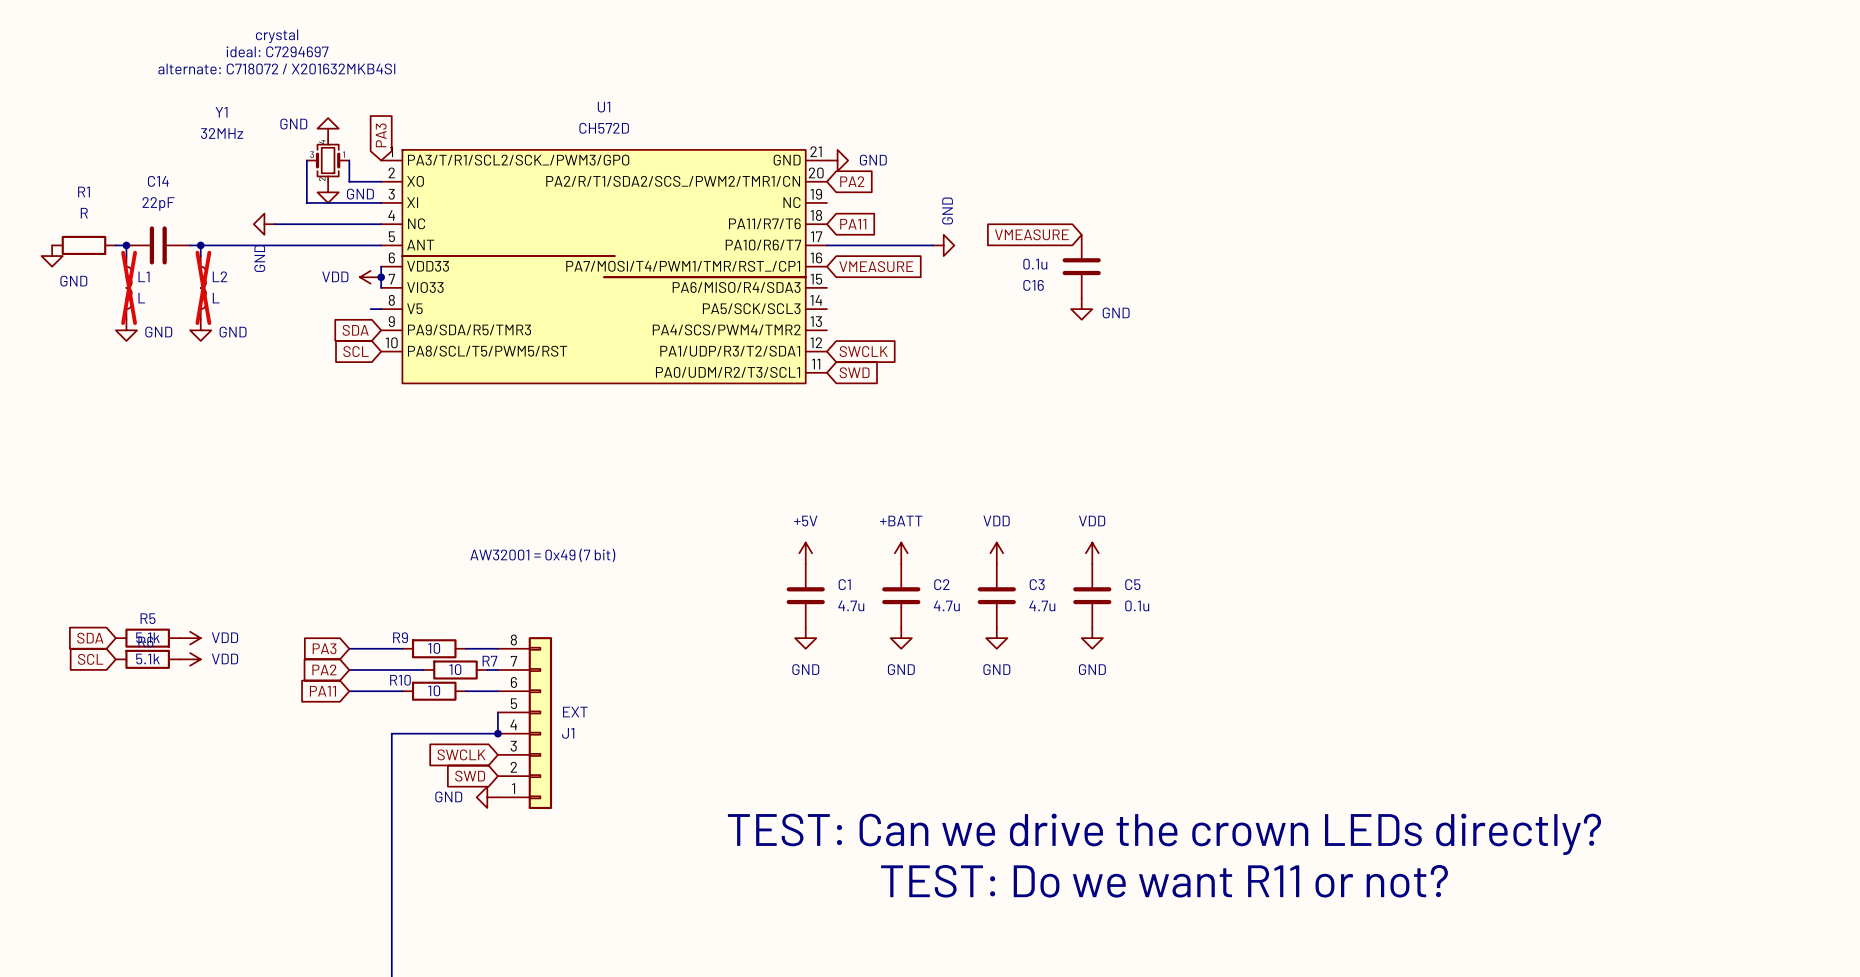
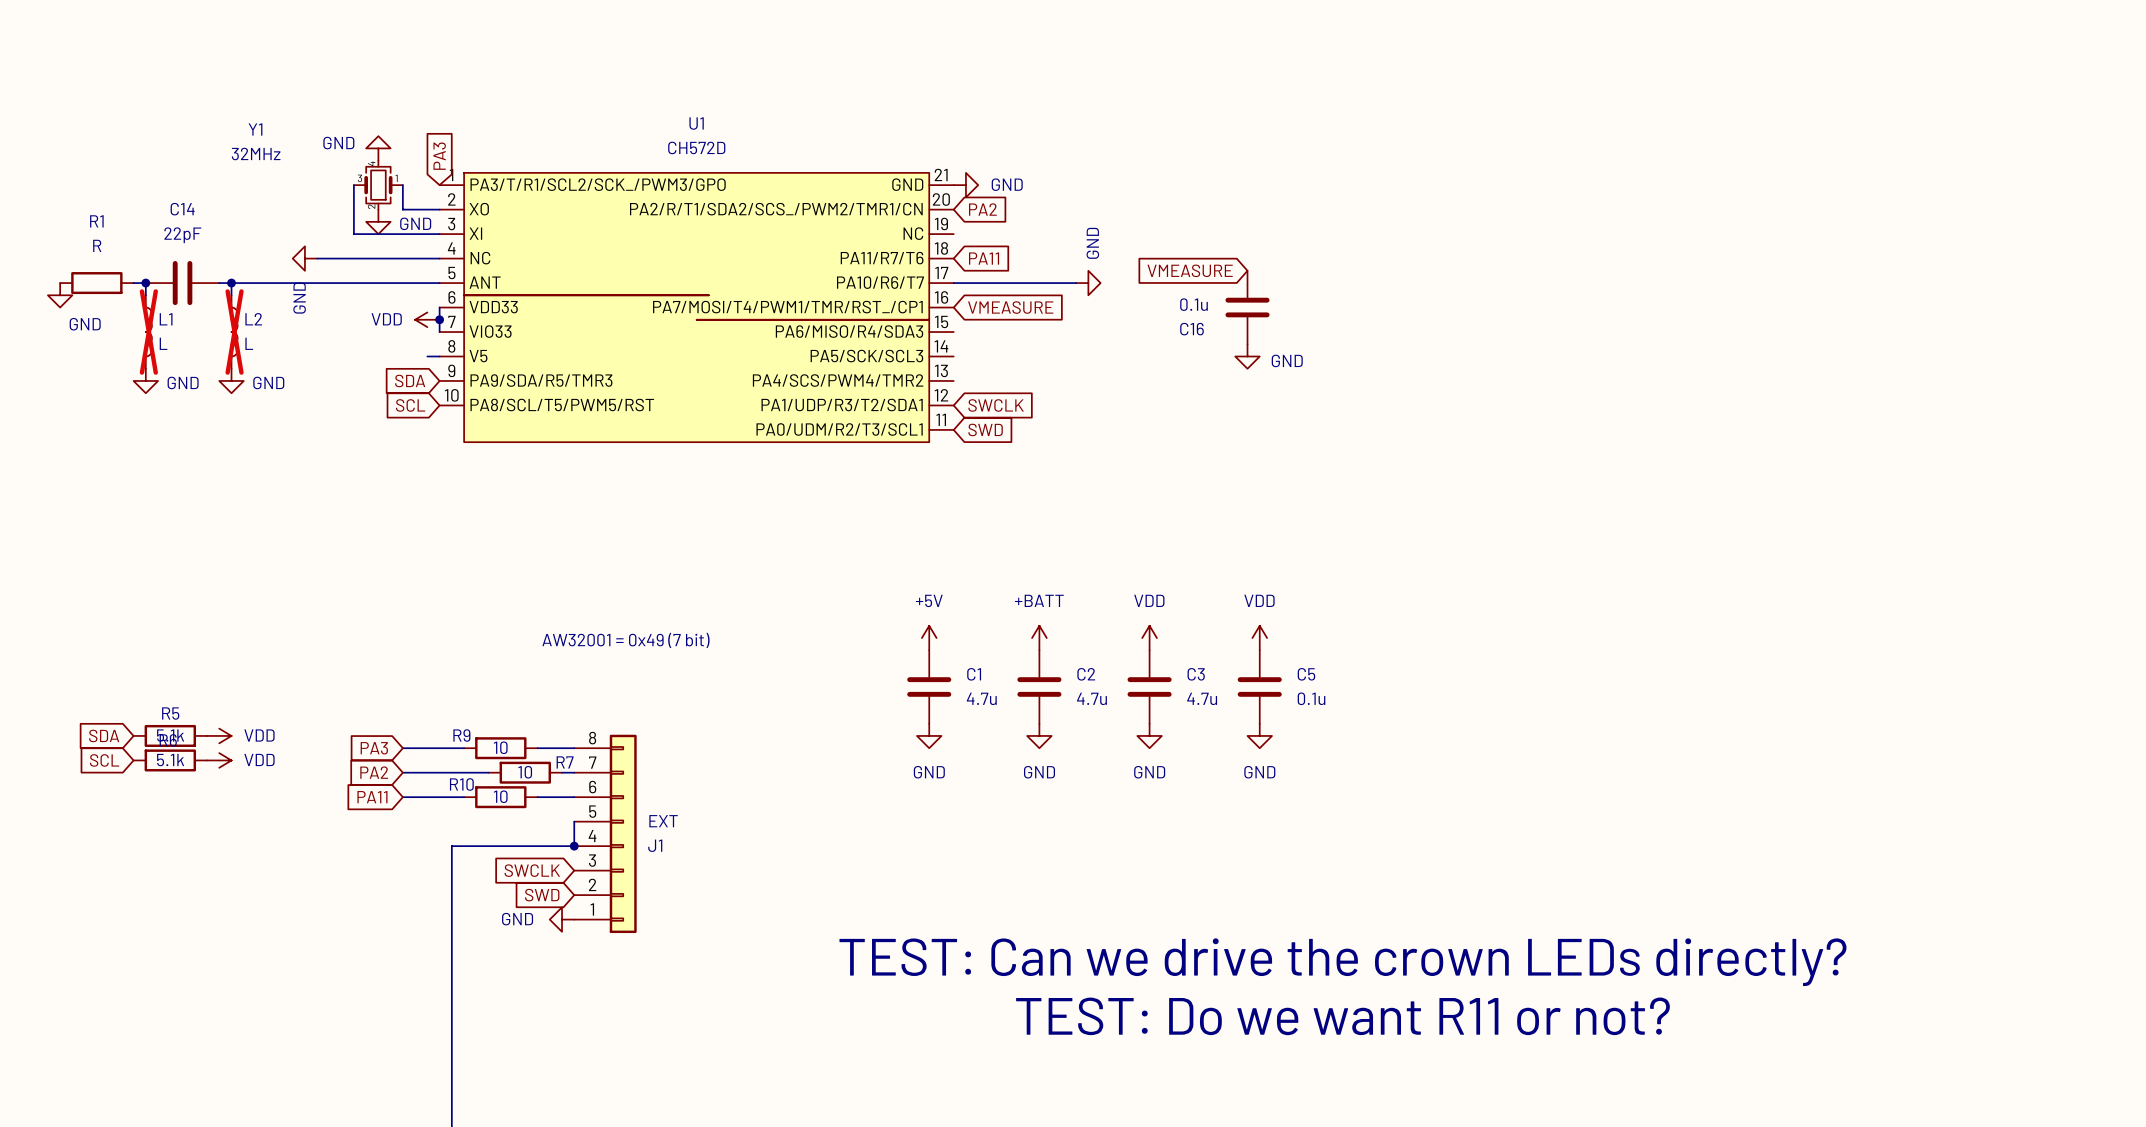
text: crystal (277, 36) -> none
text: ideal: C7294697 (277, 51) -> none
text: alternate: C718072 / X201632MKB4SI (276, 68) -> none

